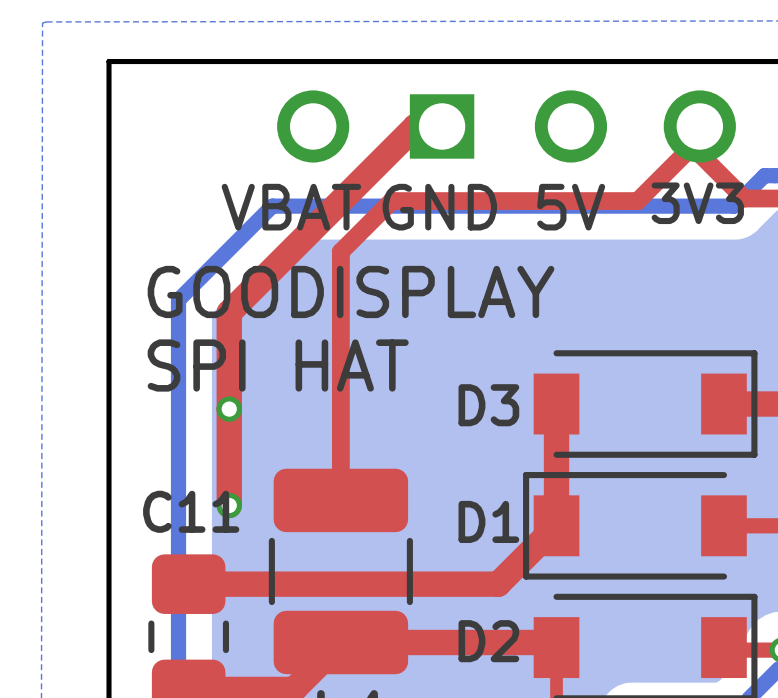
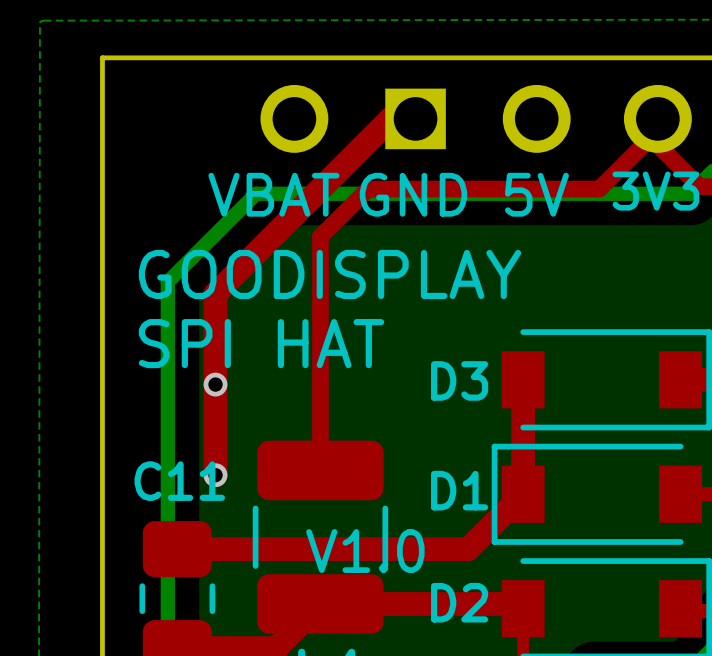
text: none -> V1.0 (365, 551)

